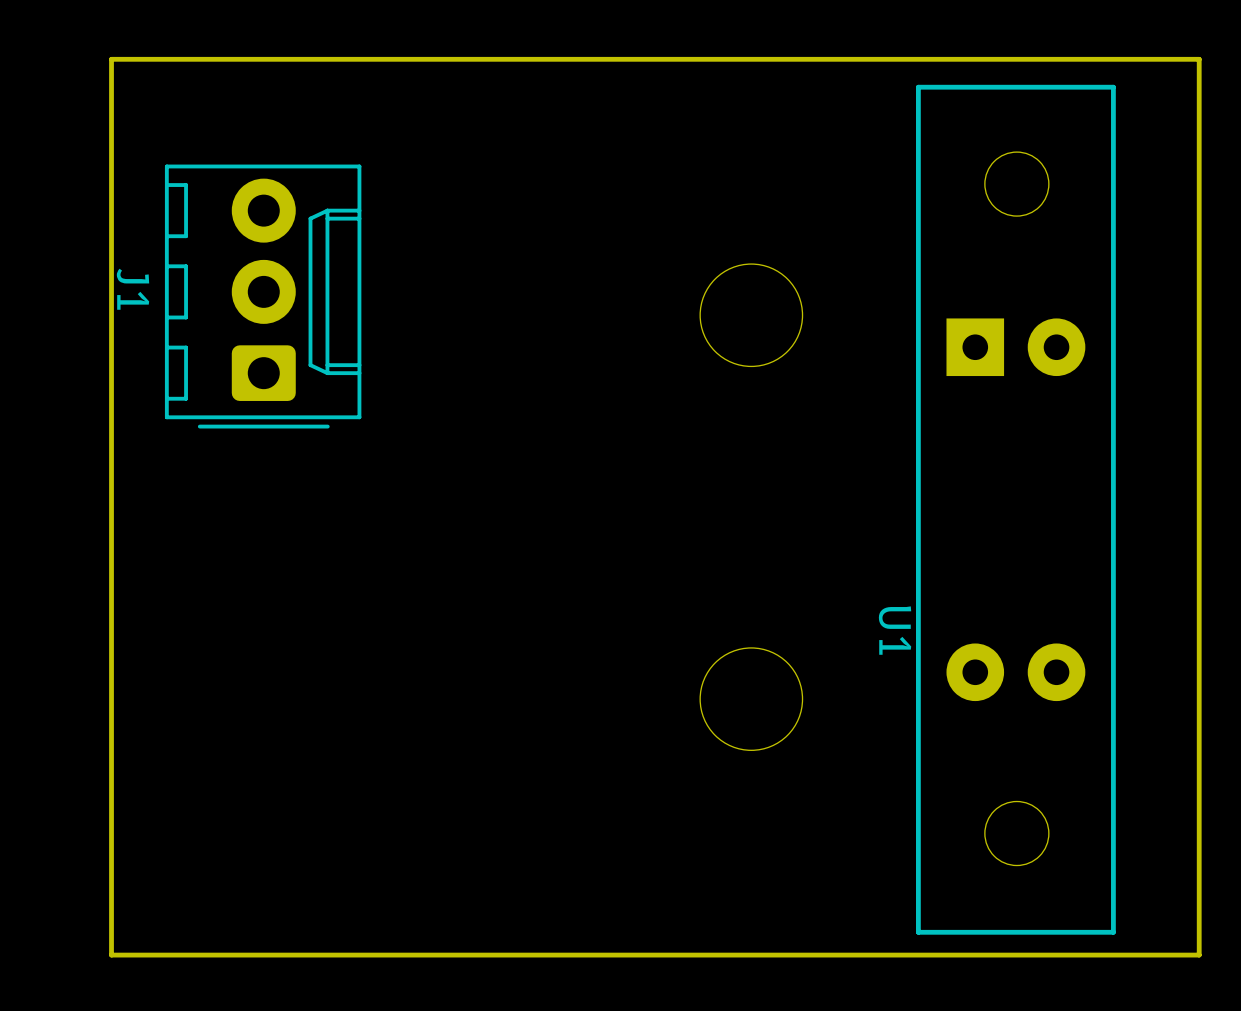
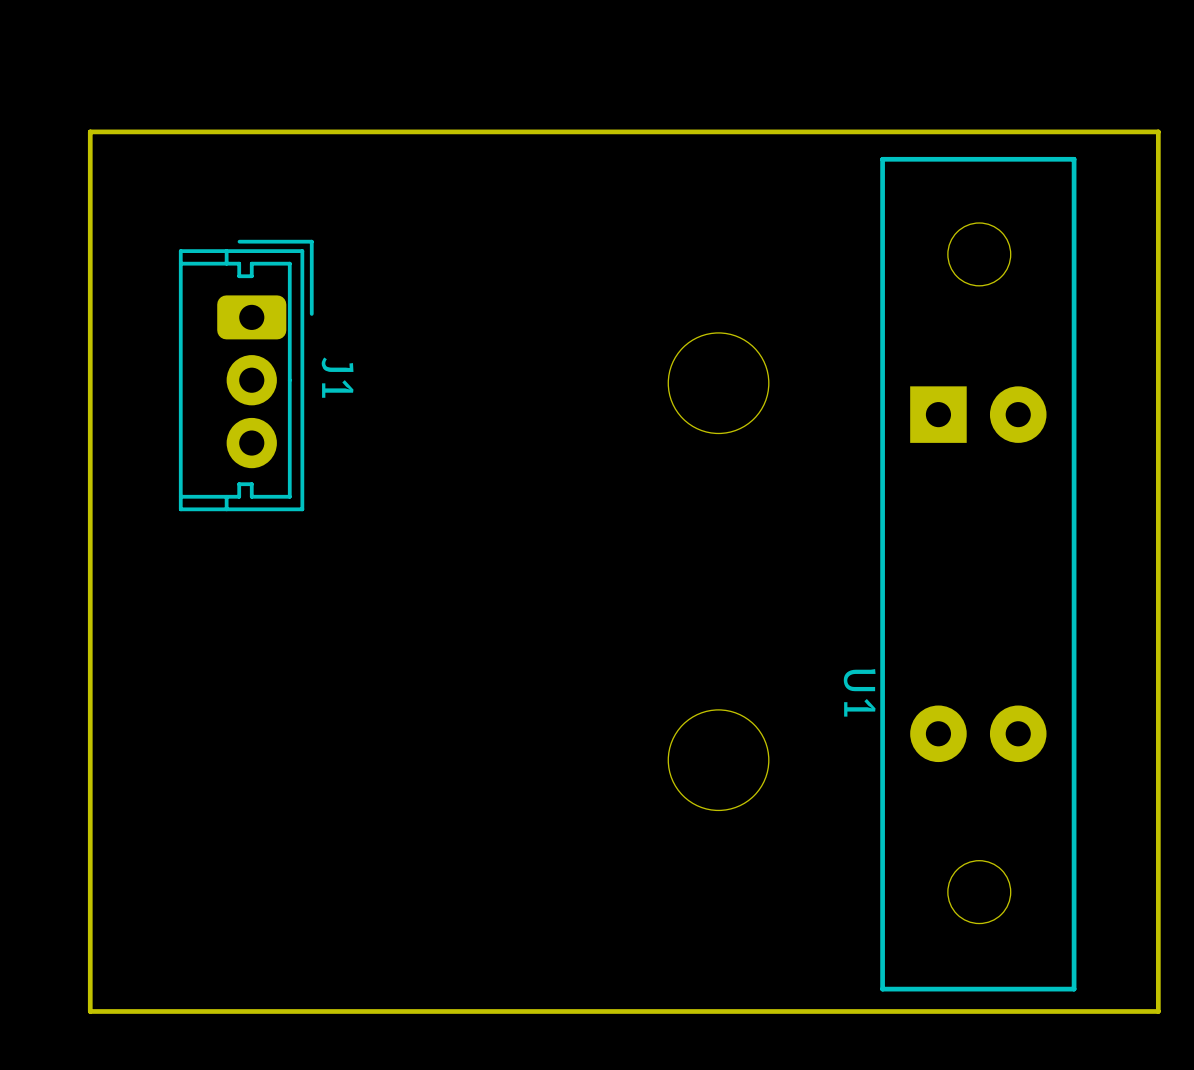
J1 footprint: [164, 164, 362, 429] -> [178, 239, 314, 512]
J1 name position: J1 (133, 289) -> J1 (337, 377)

